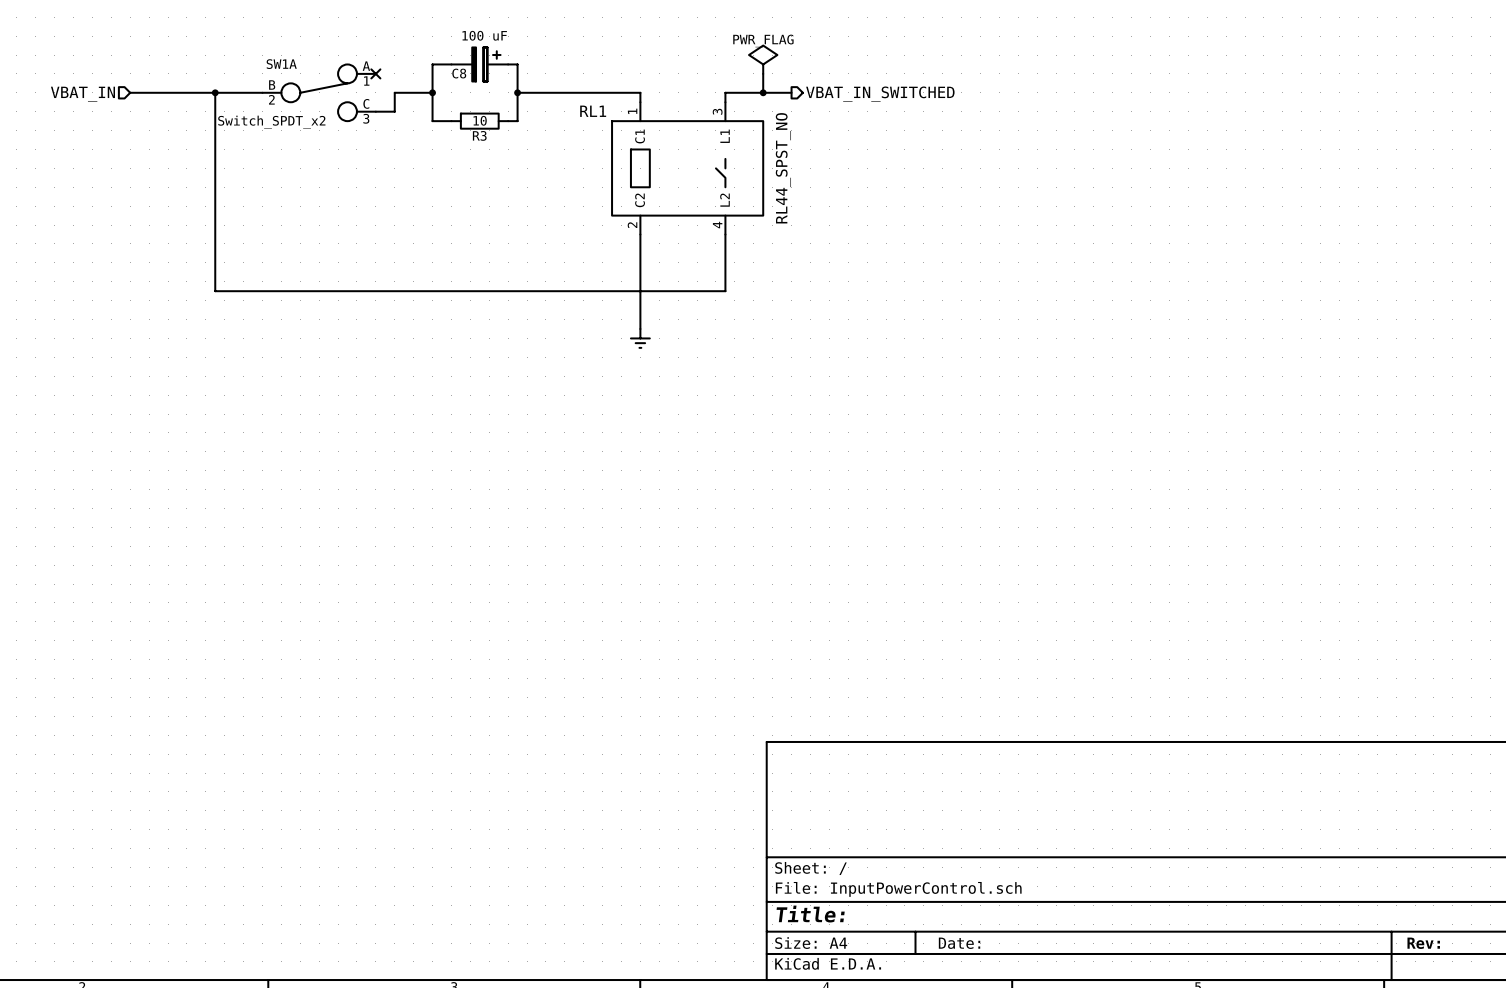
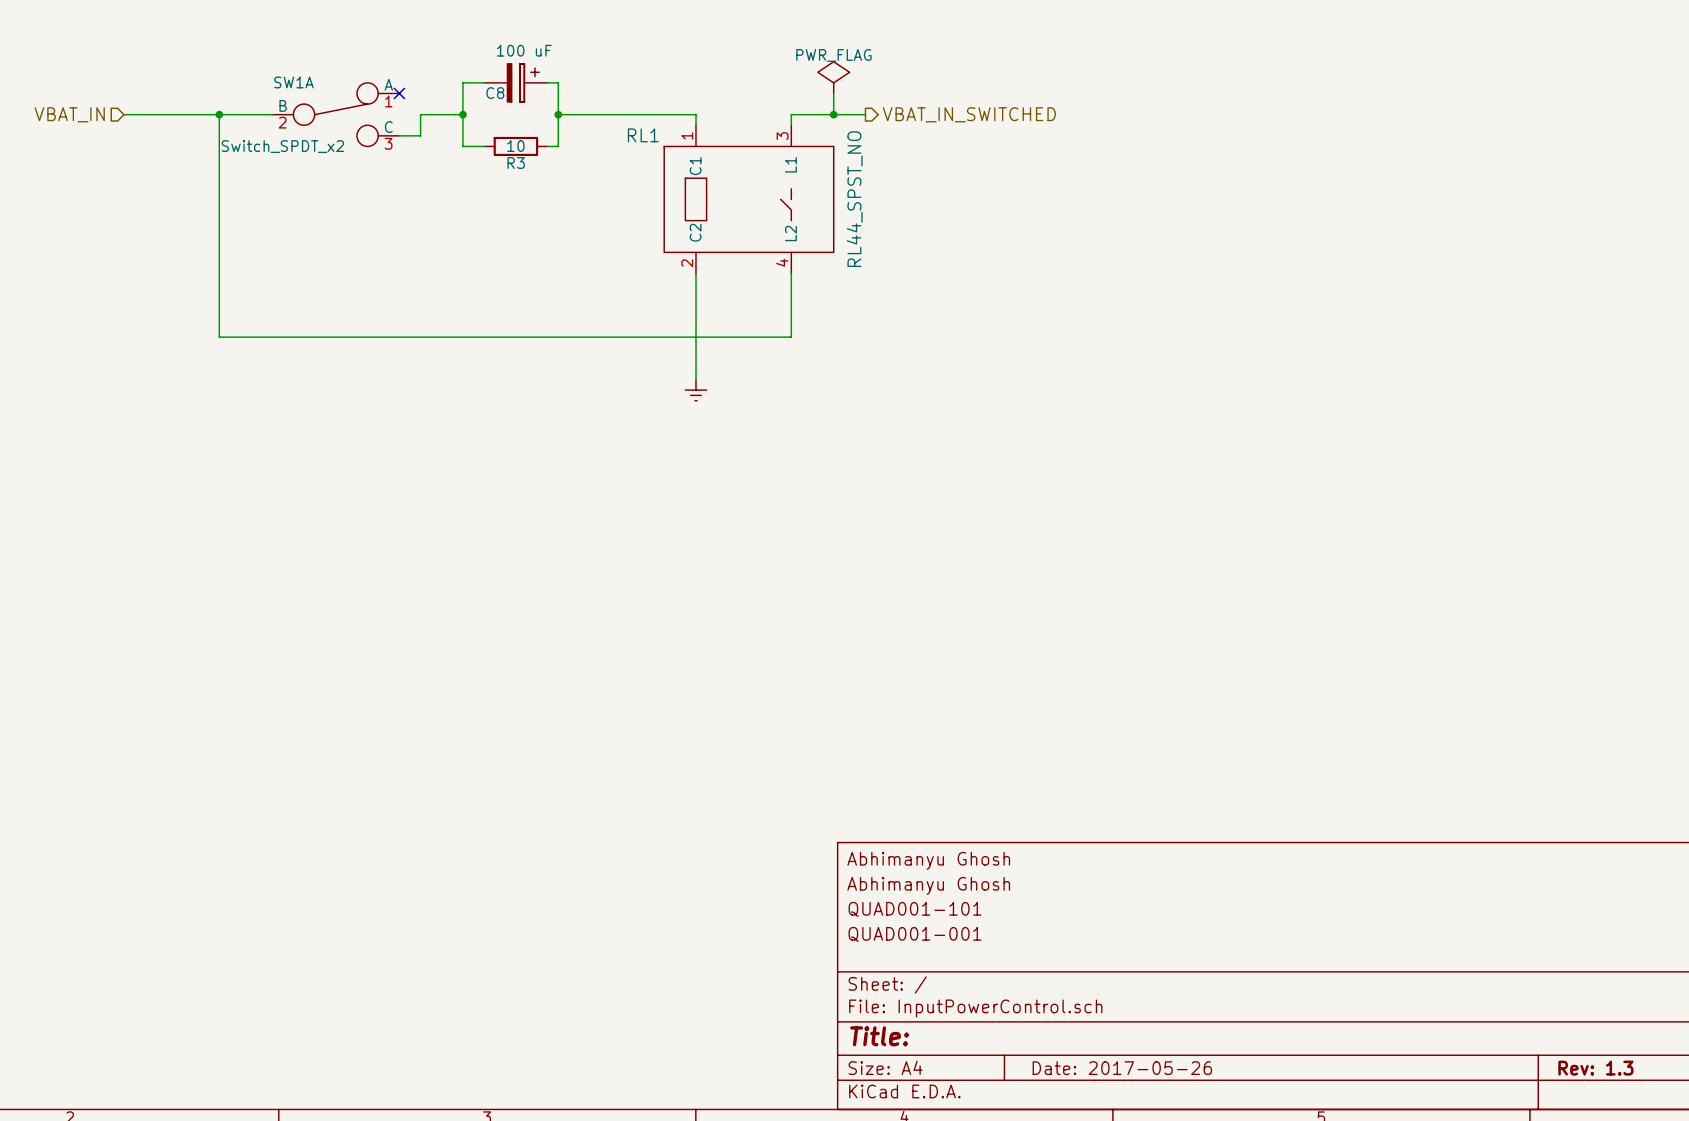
title block: none -> Abhimanyu Ghosh (928, 860)
title block: none -> Abhimanyu Ghosh (928, 885)
title block: none -> QUAD001-101 (915, 909)
title block: none -> QUAD001-001 (915, 934)
title block: Date: (959, 943) -> Date: 2017-05-26 (1122, 1068)
title block: Rev: (1423, 943) -> Rev: 1.3 (1595, 1068)

